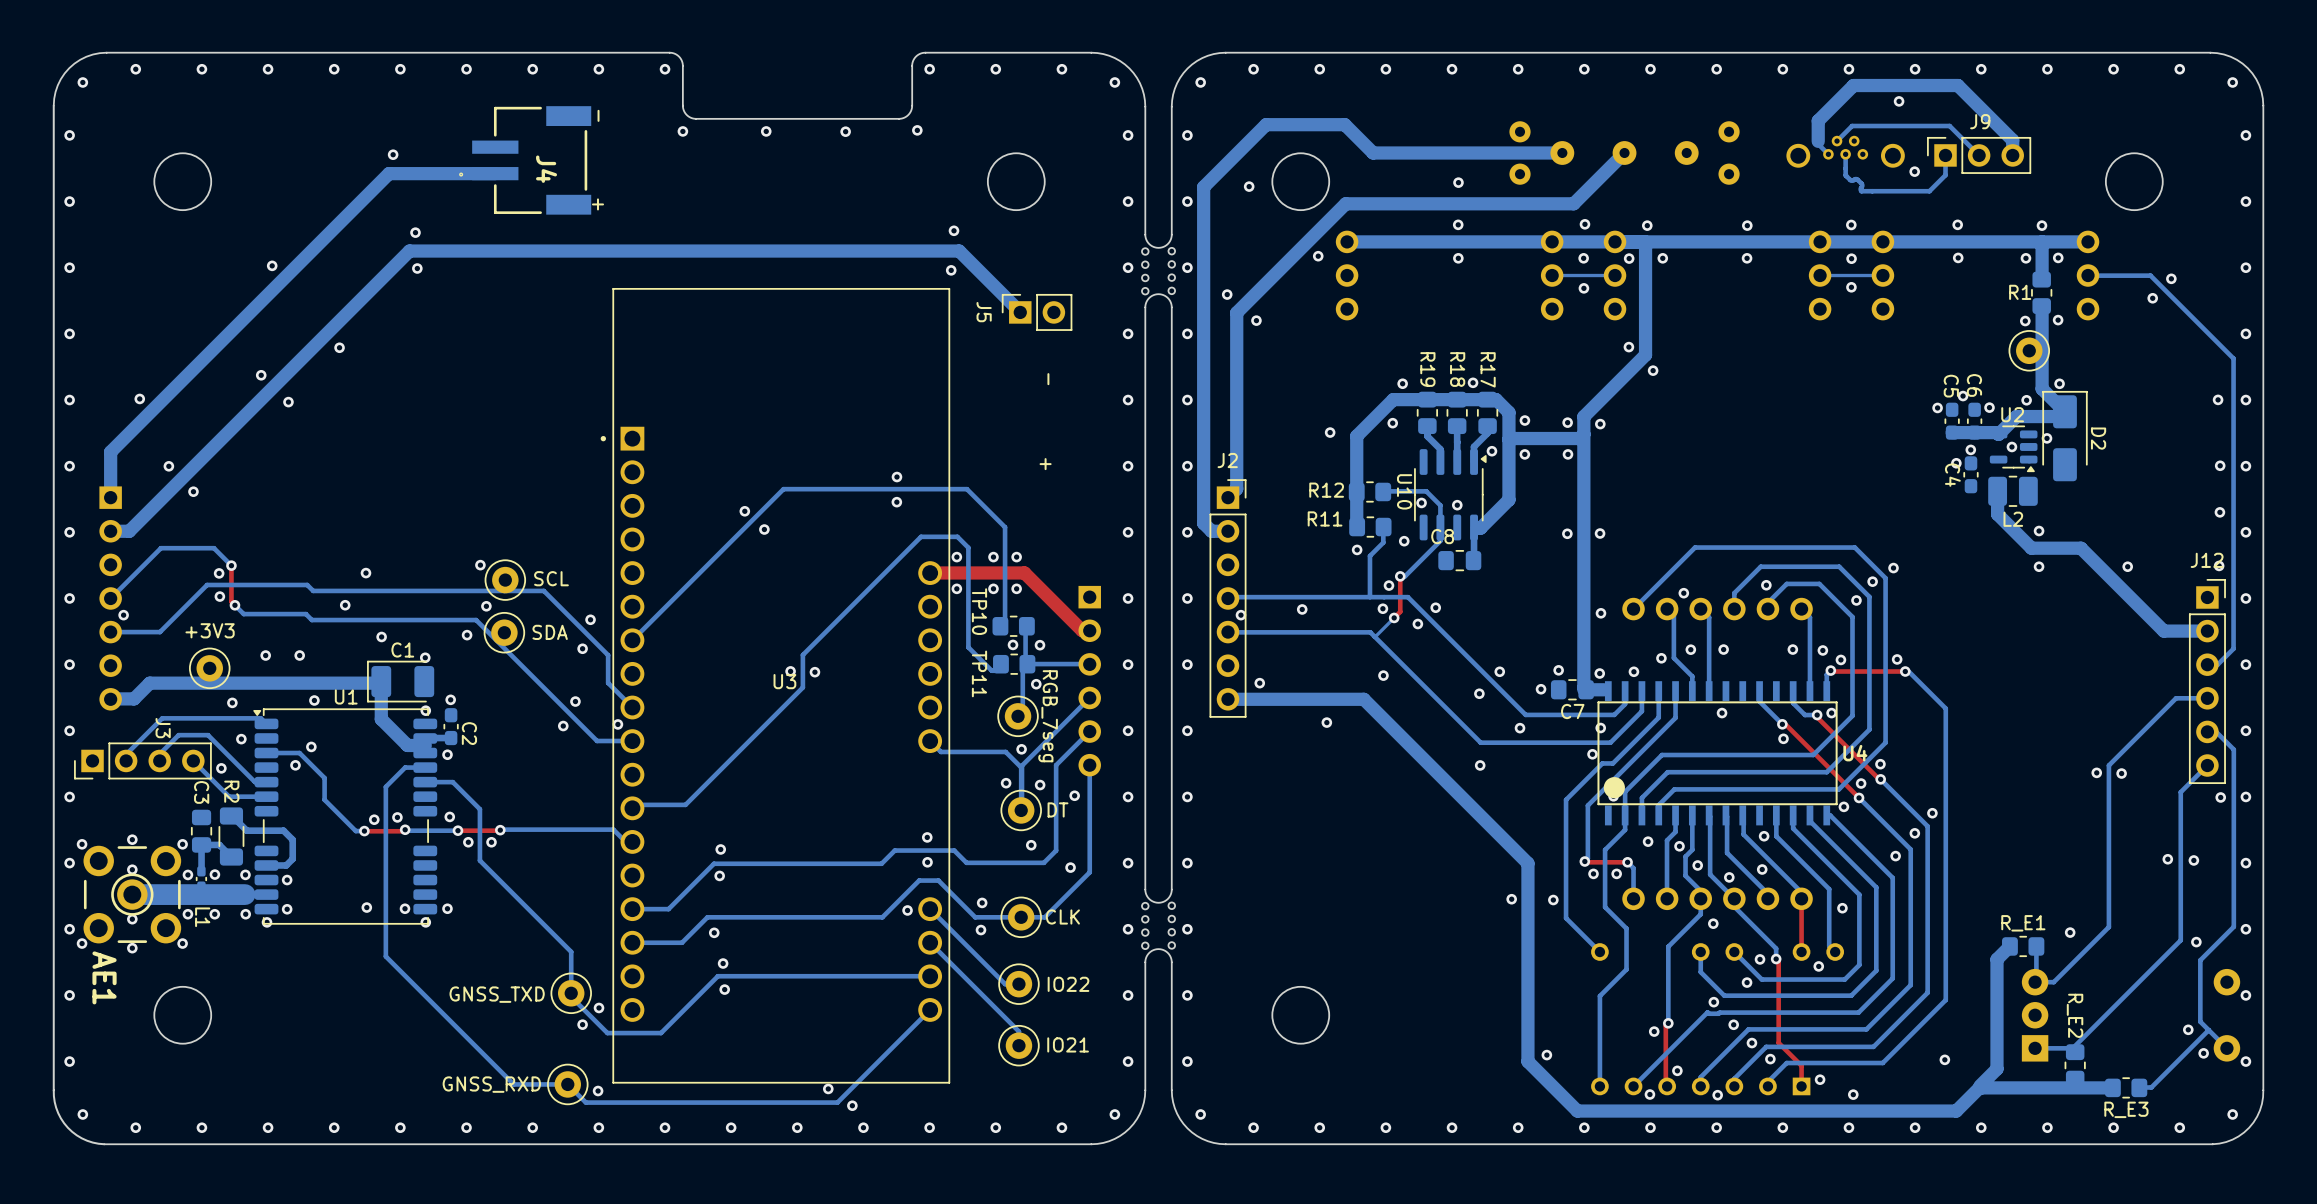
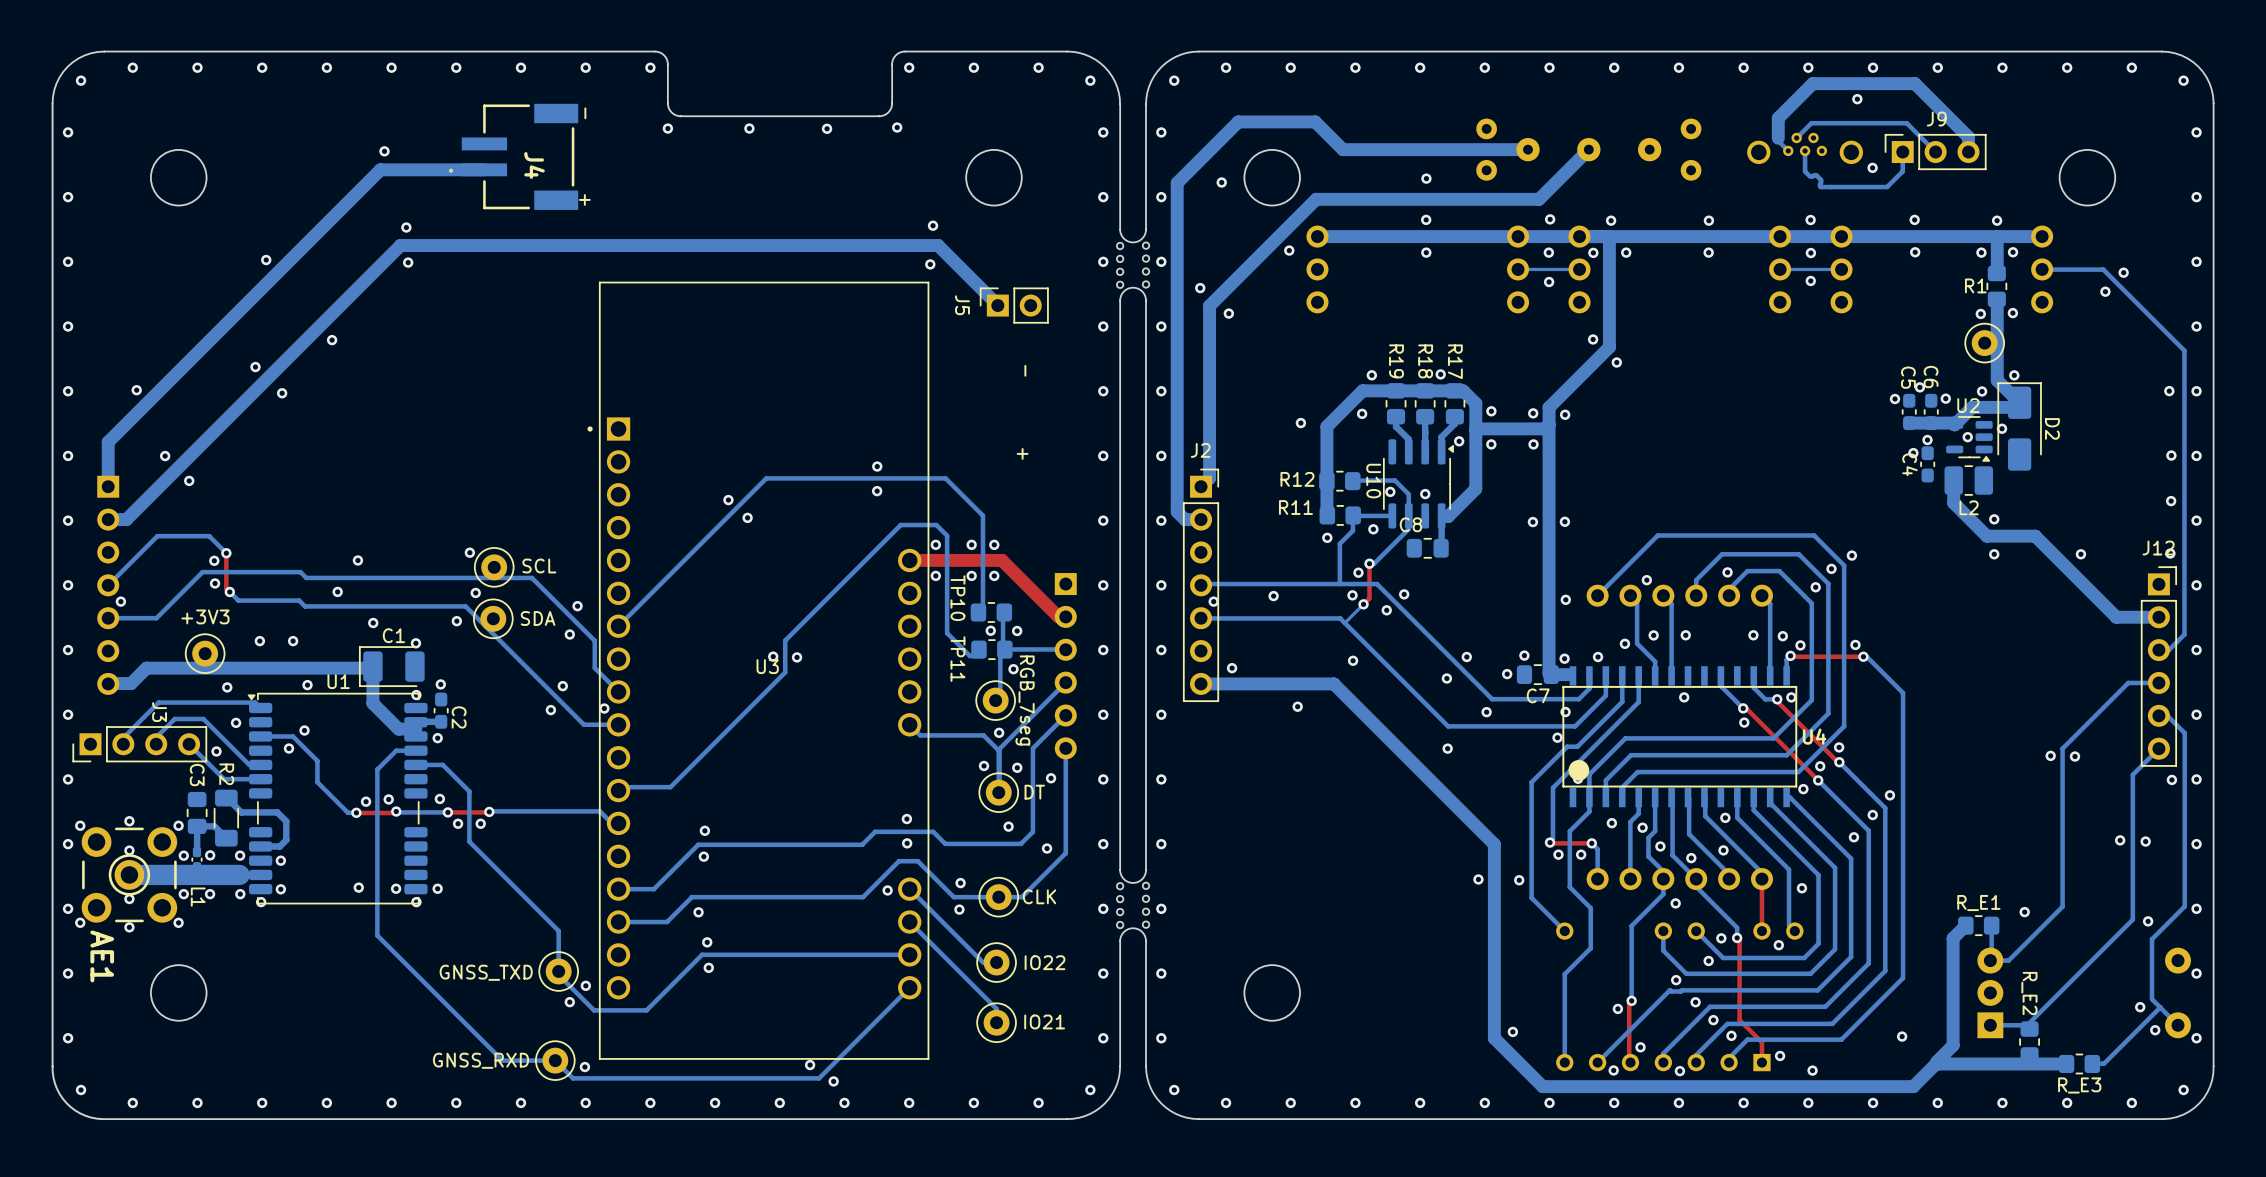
bottom track: none -> (1353, 515) (1392, 515)

